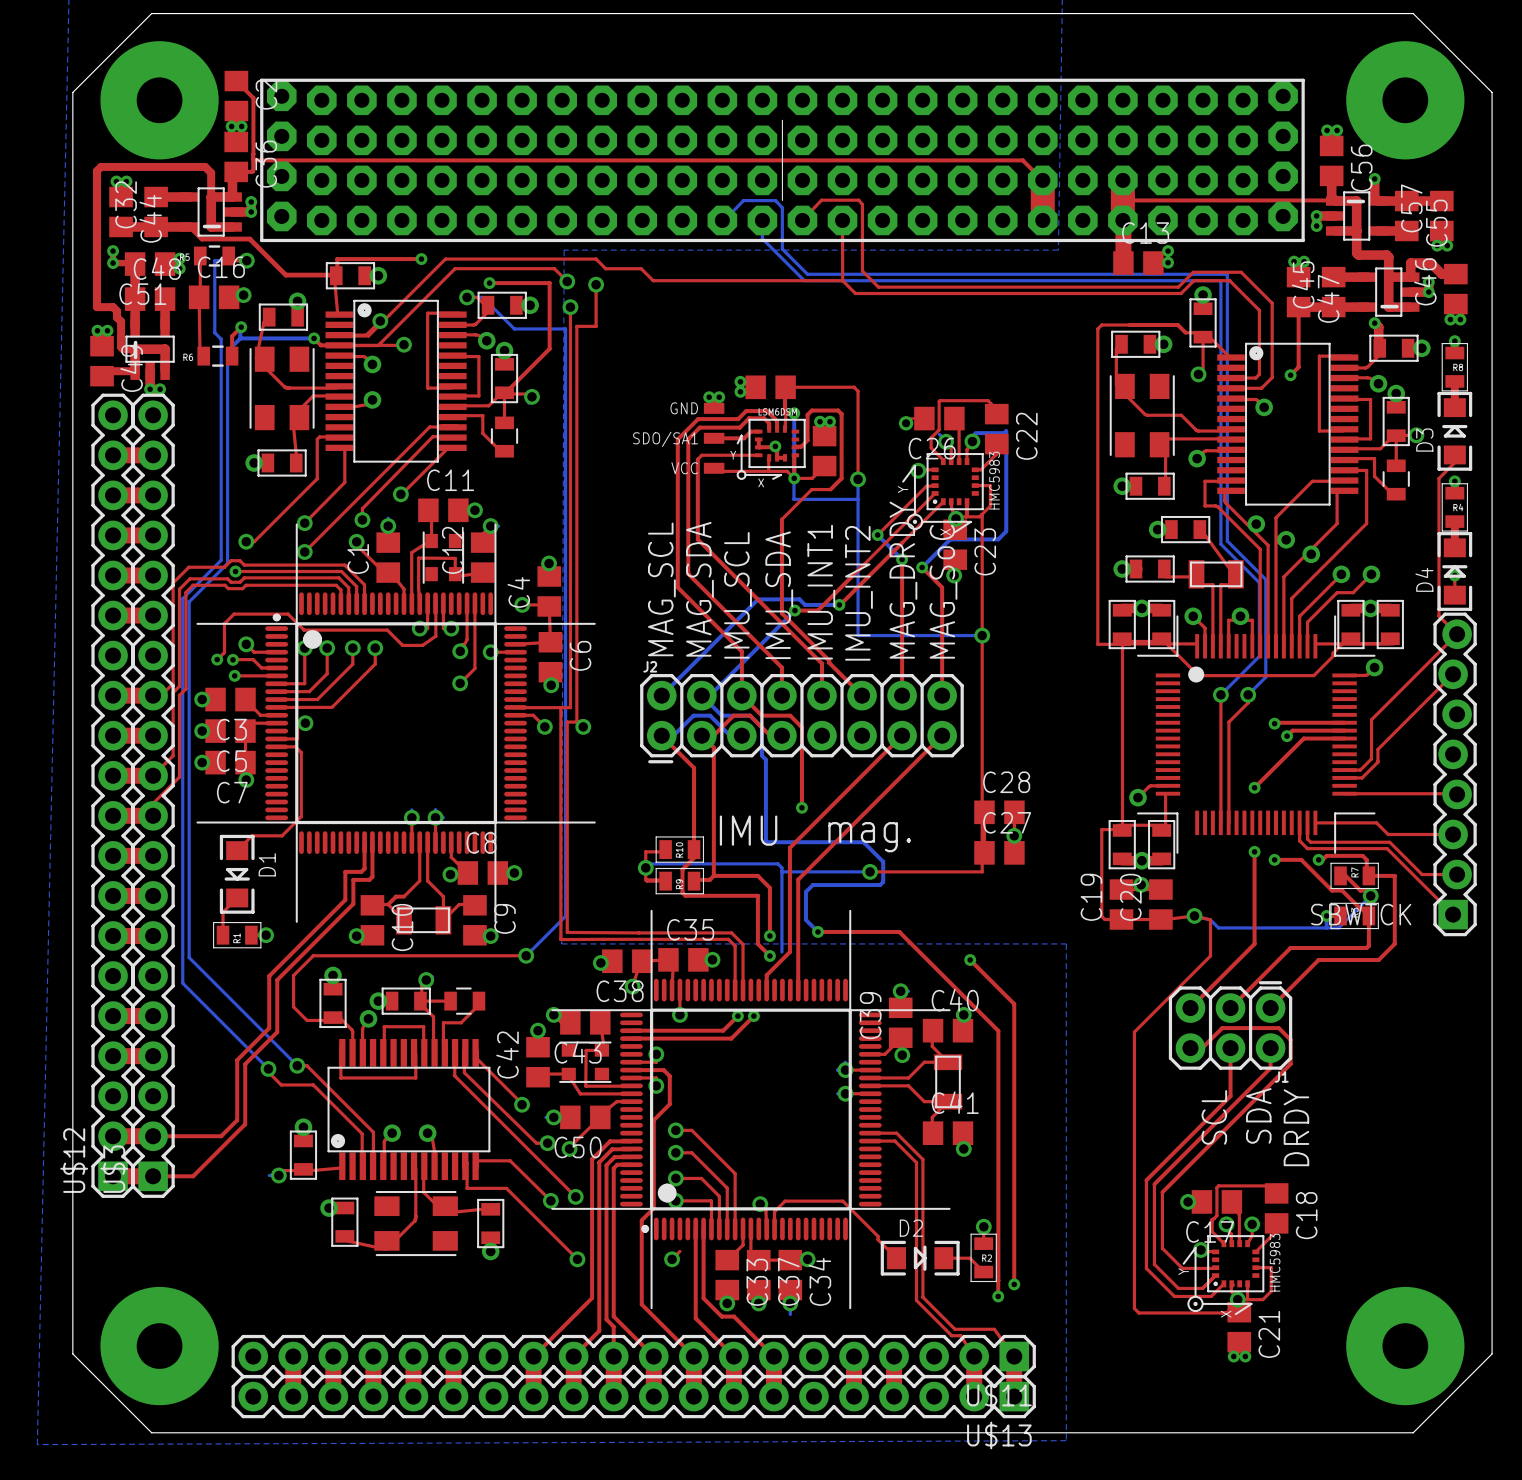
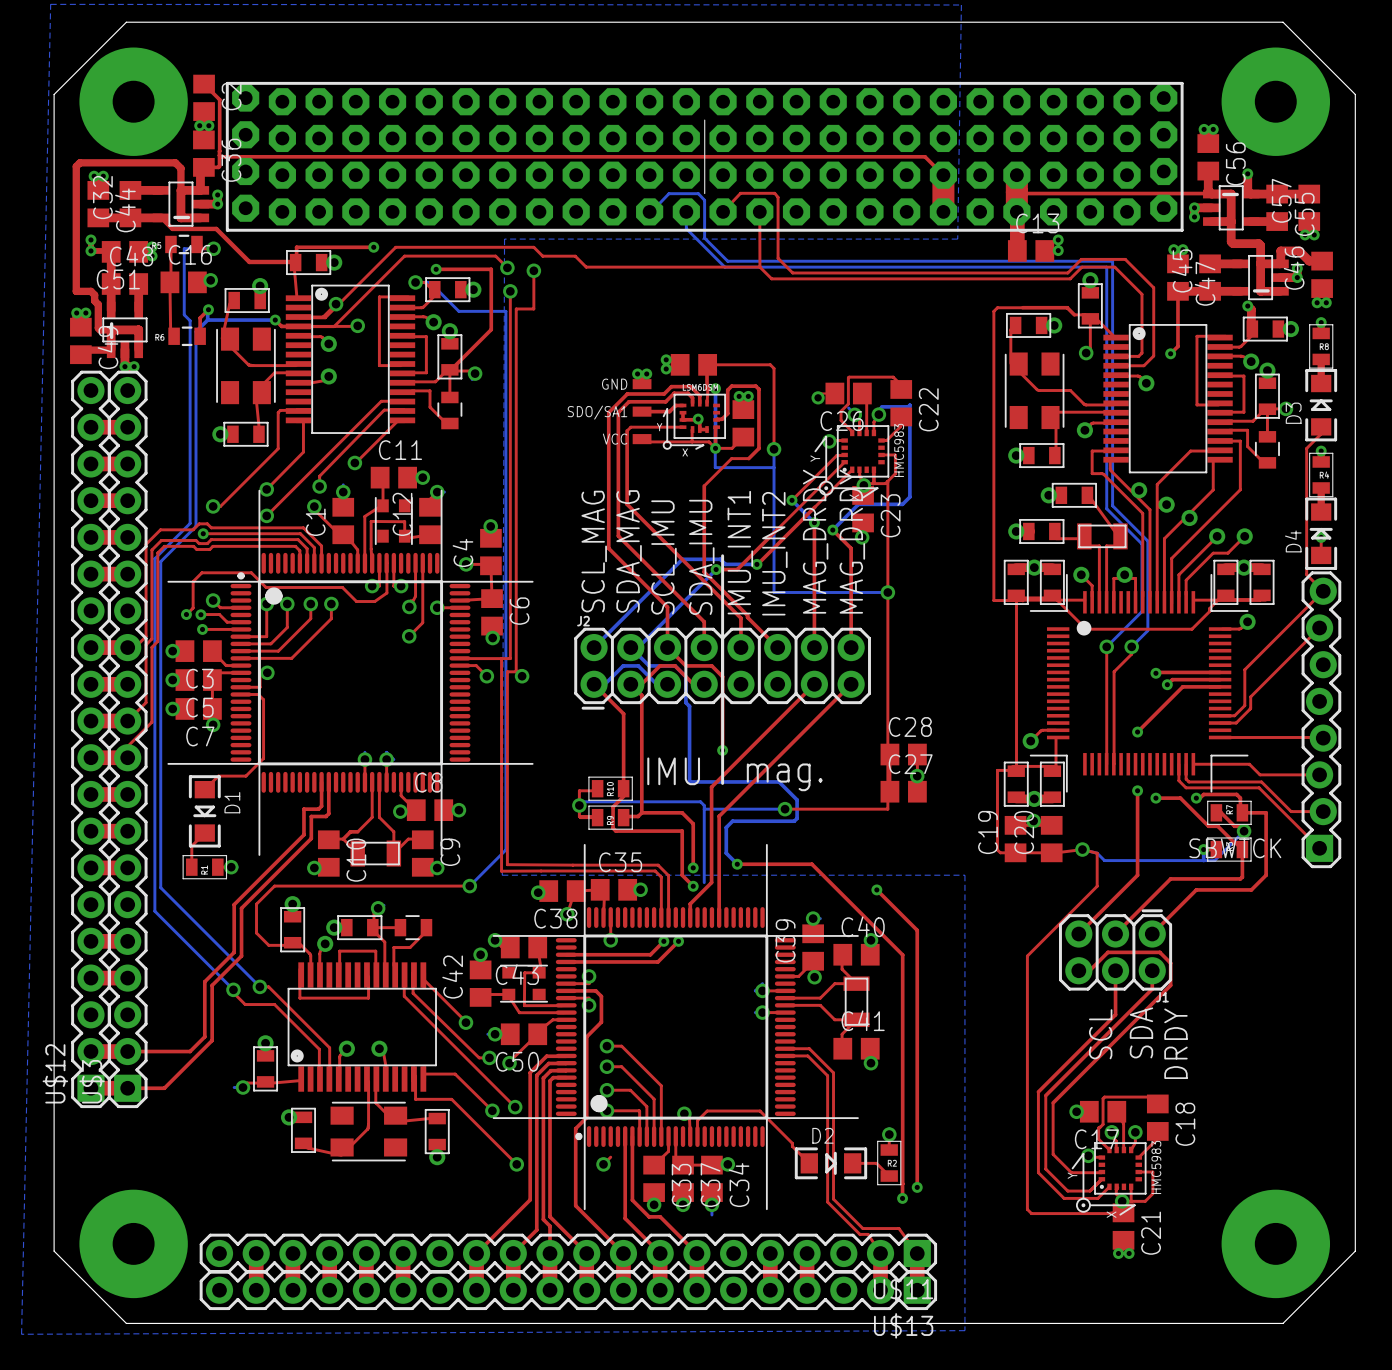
text: MAG_SCL (661, 589) -> SCL_MAG (594, 551)
text: MAG_SDA (699, 589) -> SDA_MAG (629, 551)
text: MAG_SoC (943, 591) -> MAG_DRDY (852, 541)
text: IMU_SCL (737, 595) -> SCL_IMU (663, 557)
text: IMU_SDA (779, 595) -> SDA_IMU (701, 557)
line: none -> (722, 555) (722, 783)

